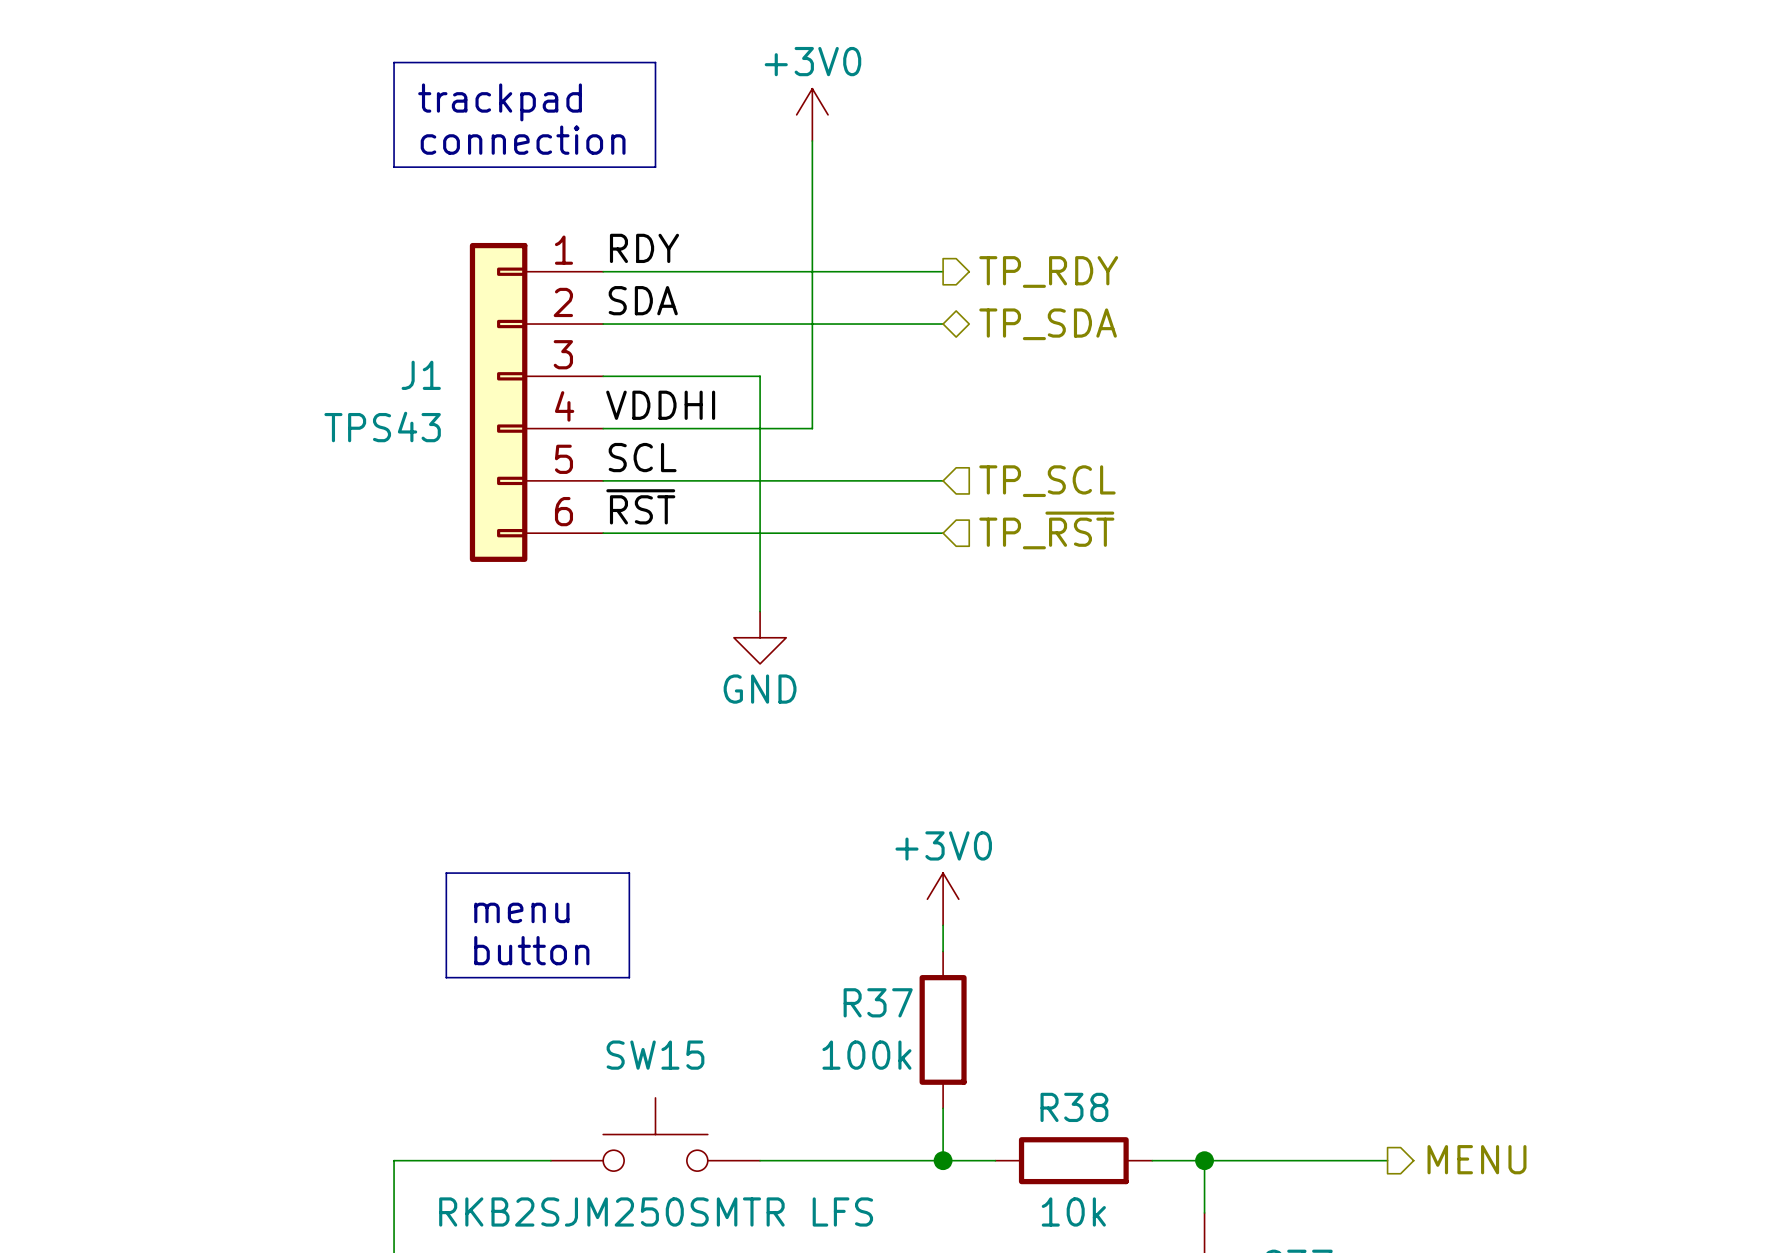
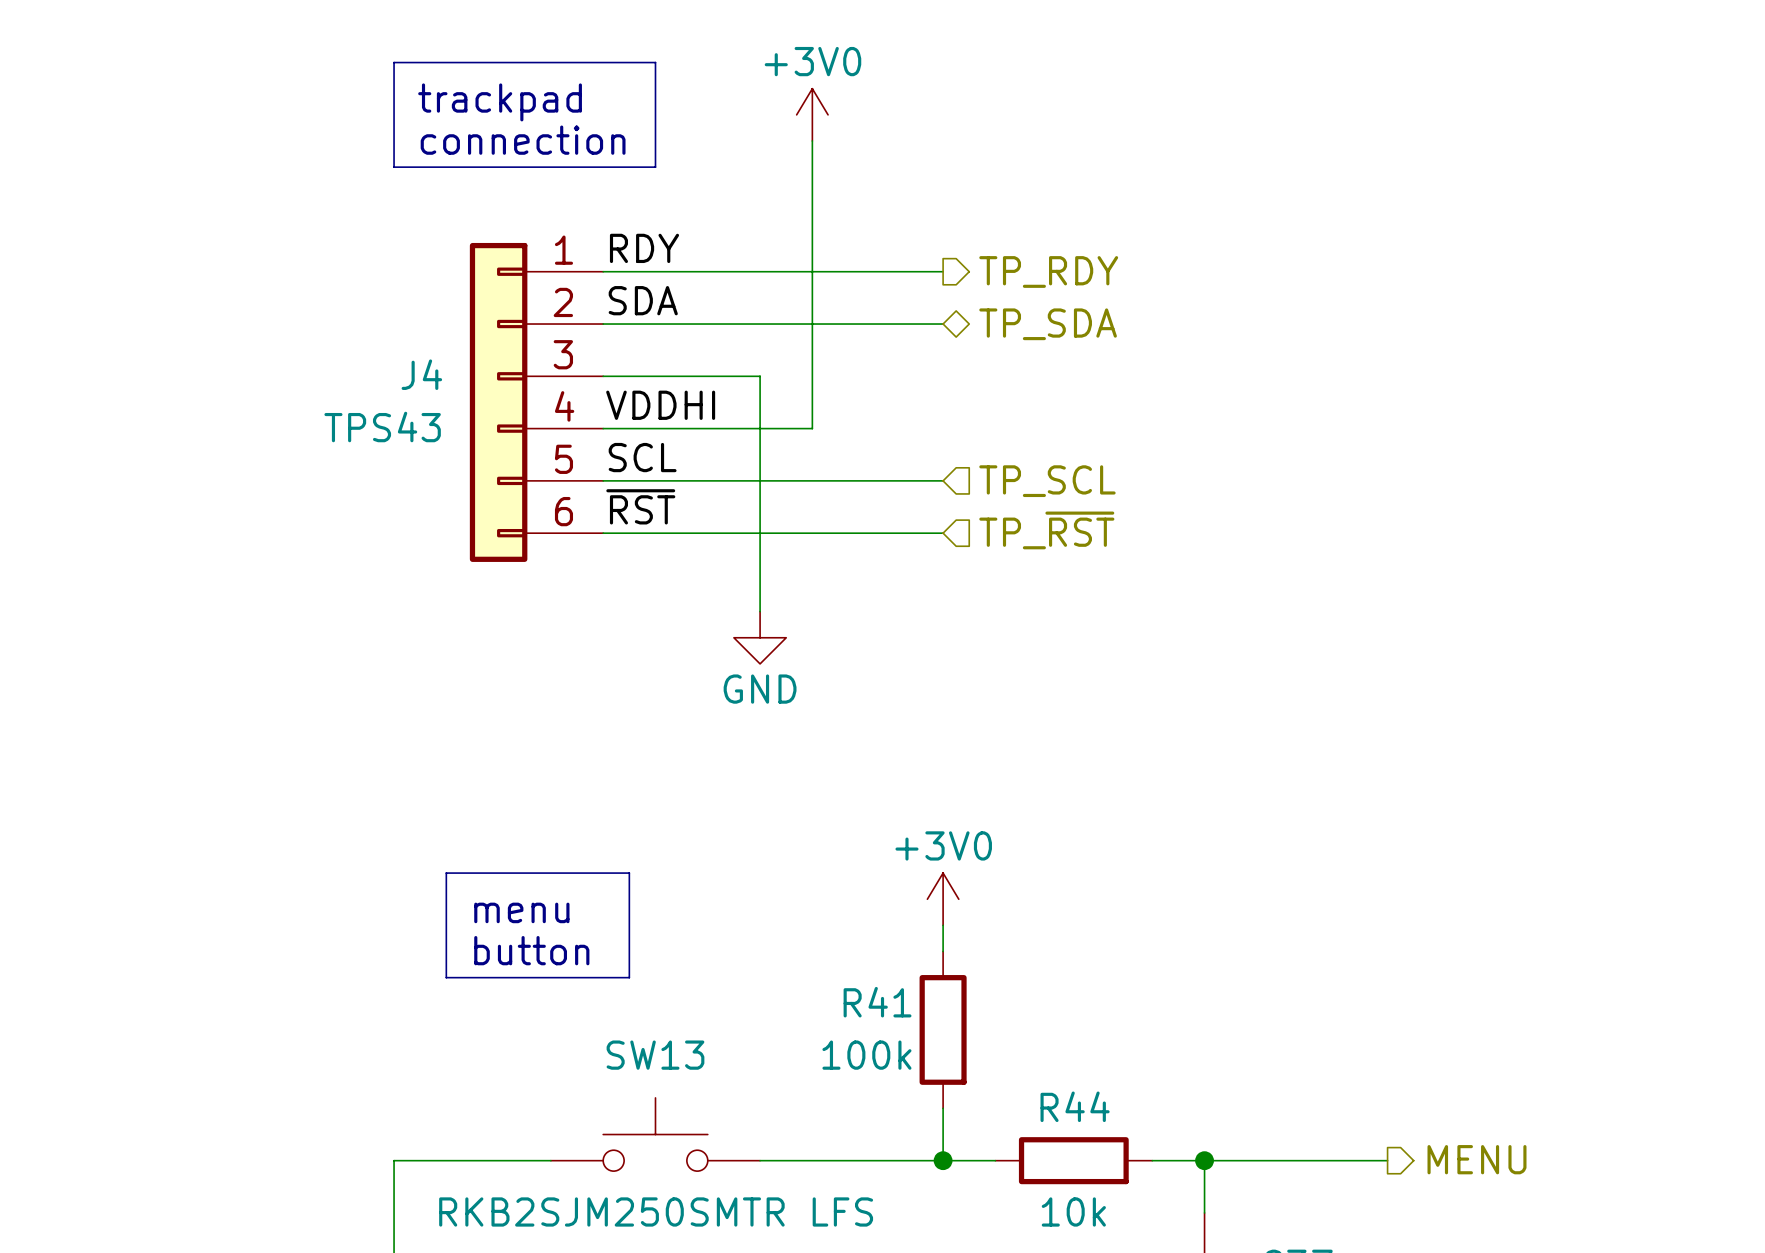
J1 name: J1 (421, 375) -> J4 (421, 374)
R37 name: R37 (878, 1002) -> R41 (877, 1002)
SW15 name: SW15 (655, 1055) -> SW13 (655, 1055)
R38 name: R38 (1074, 1107) -> R44 (1075, 1106)

